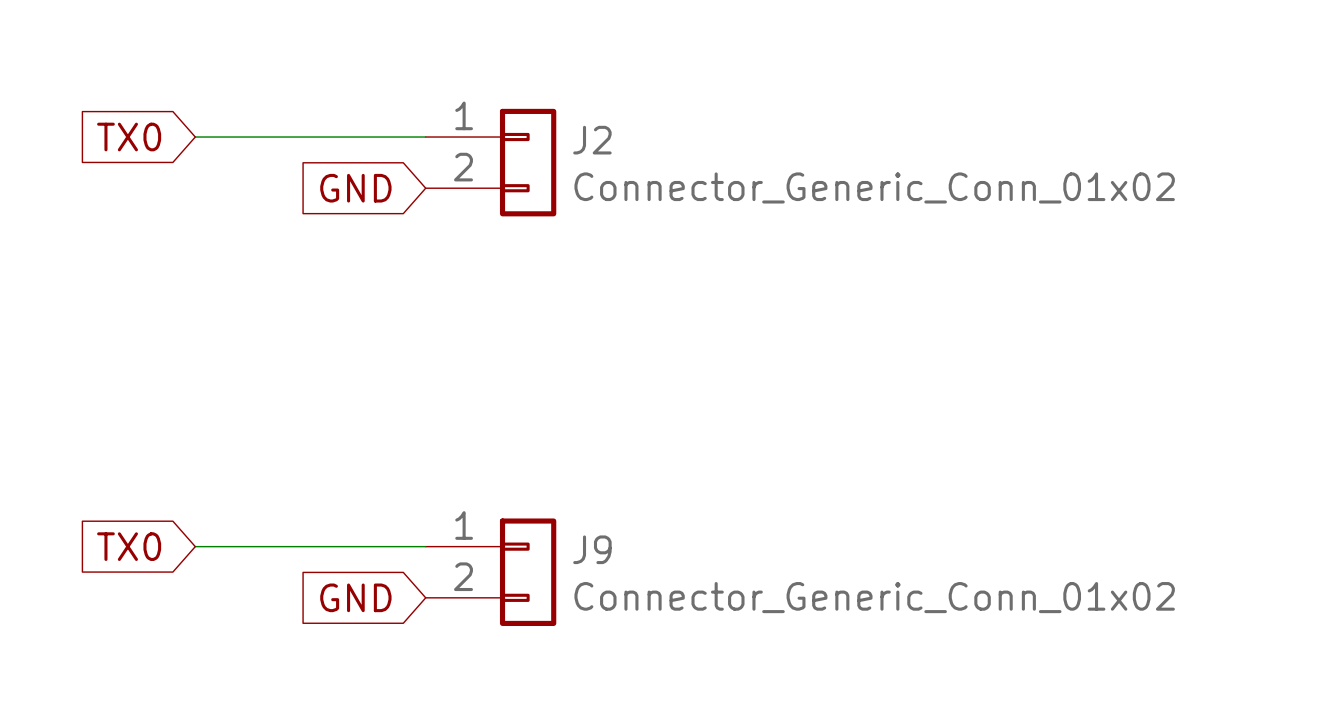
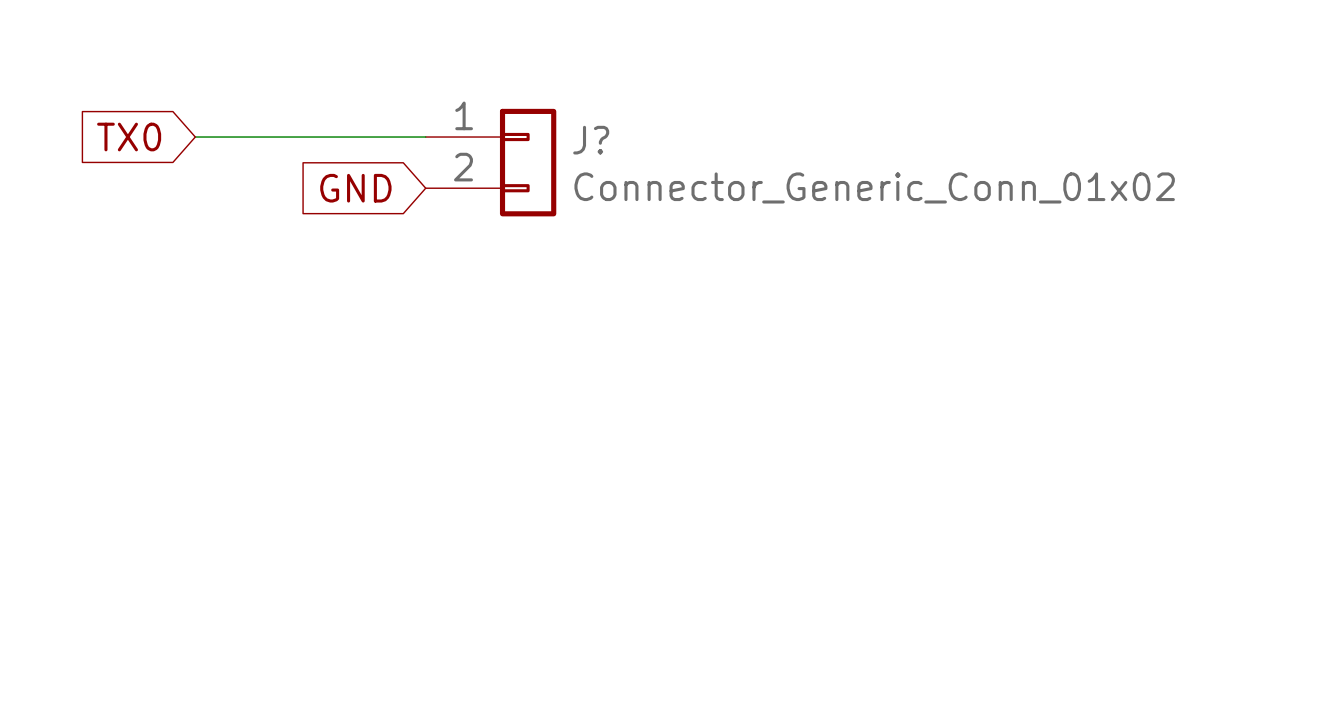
J2 name: J2 (592, 140) -> J? (591, 140)
global label: TX0 (129, 546) -> none
wire: (195, 546) (425, 546) -> none
J9: Connector_Generic_Conn_01x02 (490, 572) -> none
global label: GND (355, 597) -> none

